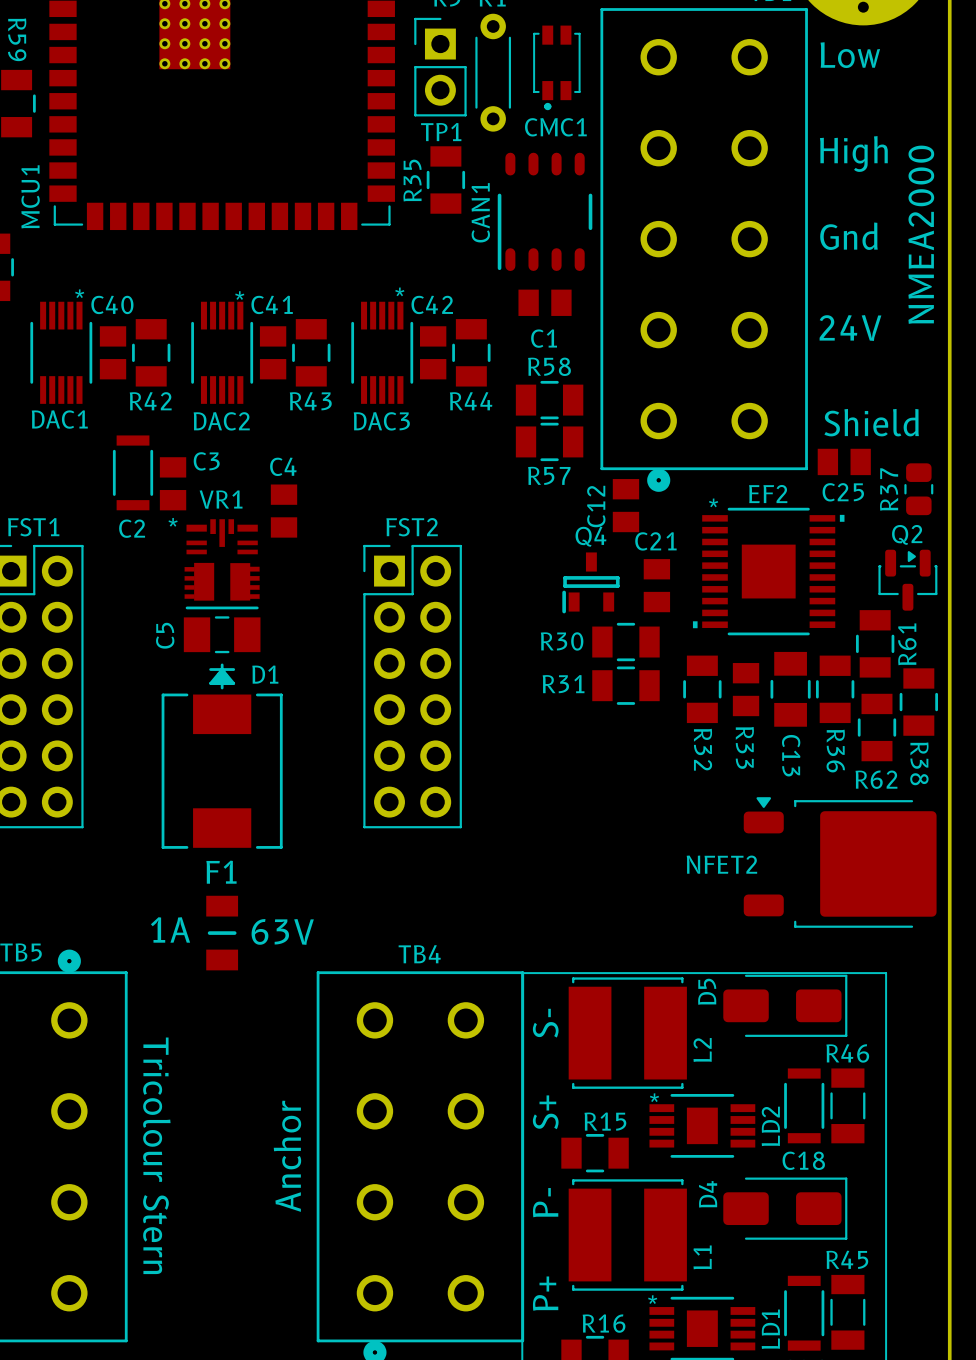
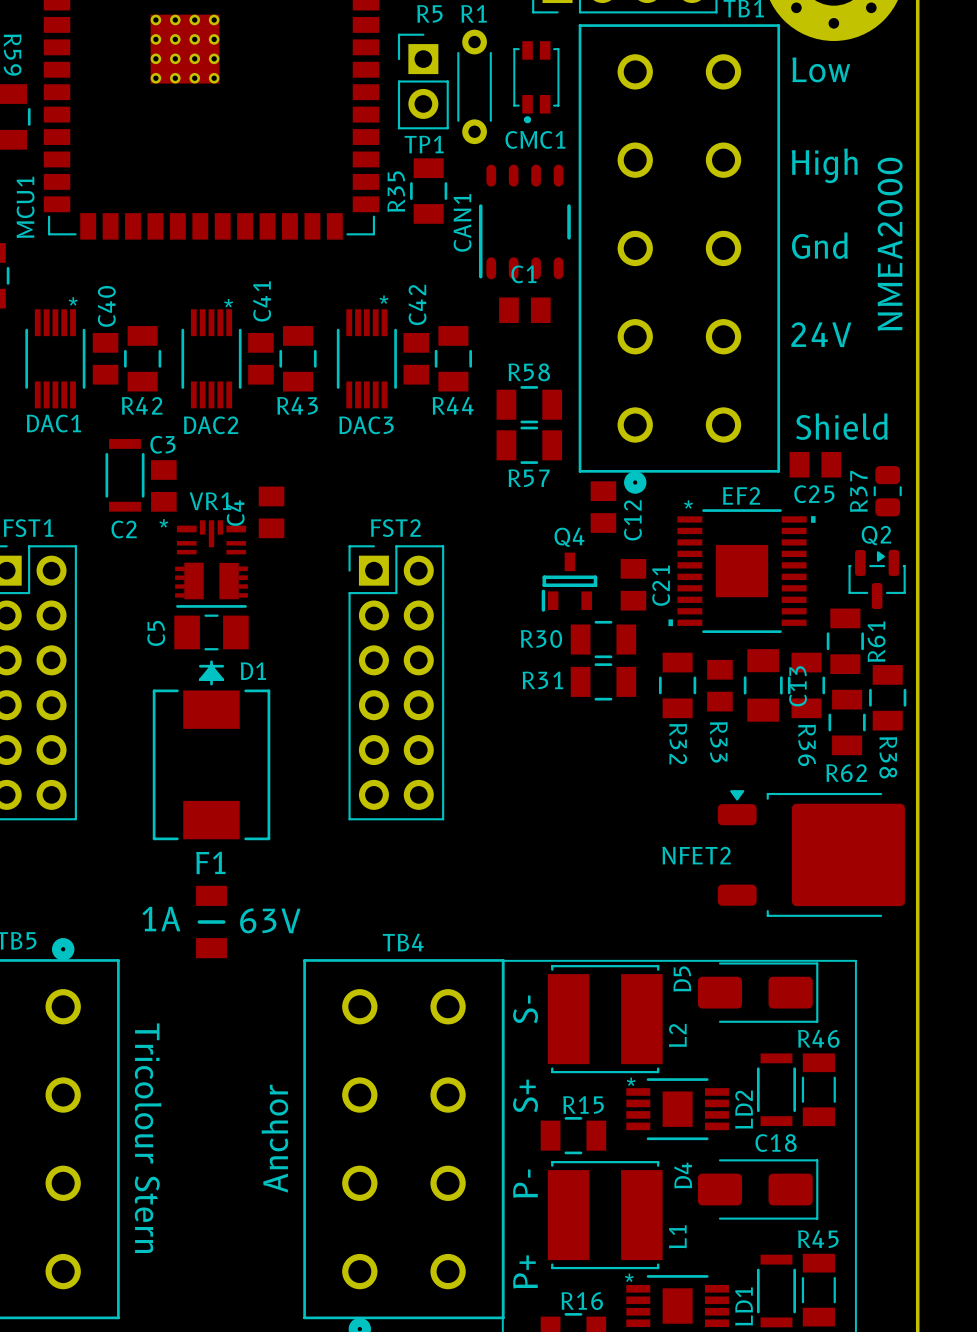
C40 name rotation: 0° (112, 304) -> 90° counterclockwise (106, 306)
C41 name rotation: 0° (272, 304) -> 90° counterclockwise (262, 301)
C42 name rotation: 0° (432, 304) -> 90° counterclockwise (417, 304)
C1 name position: C1 (544, 338) -> C1 (523, 274)
C3 name position: C3 (206, 461) -> C3 (162, 444)
C4 name rotation: 0° (283, 466) -> 90° counterclockwise (235, 513)
C4 name position: C4 (283, 466) -> C4 (235, 513)
C12 name position: C12 (596, 506) -> C12 (632, 520)
C21 name rotation: 0° (655, 541) -> 90° counterclockwise (661, 585)
C13 name rotation: 0° (791, 755) -> 180° (797, 686)
C13 name position: C13 (791, 755) -> C13 (797, 686)

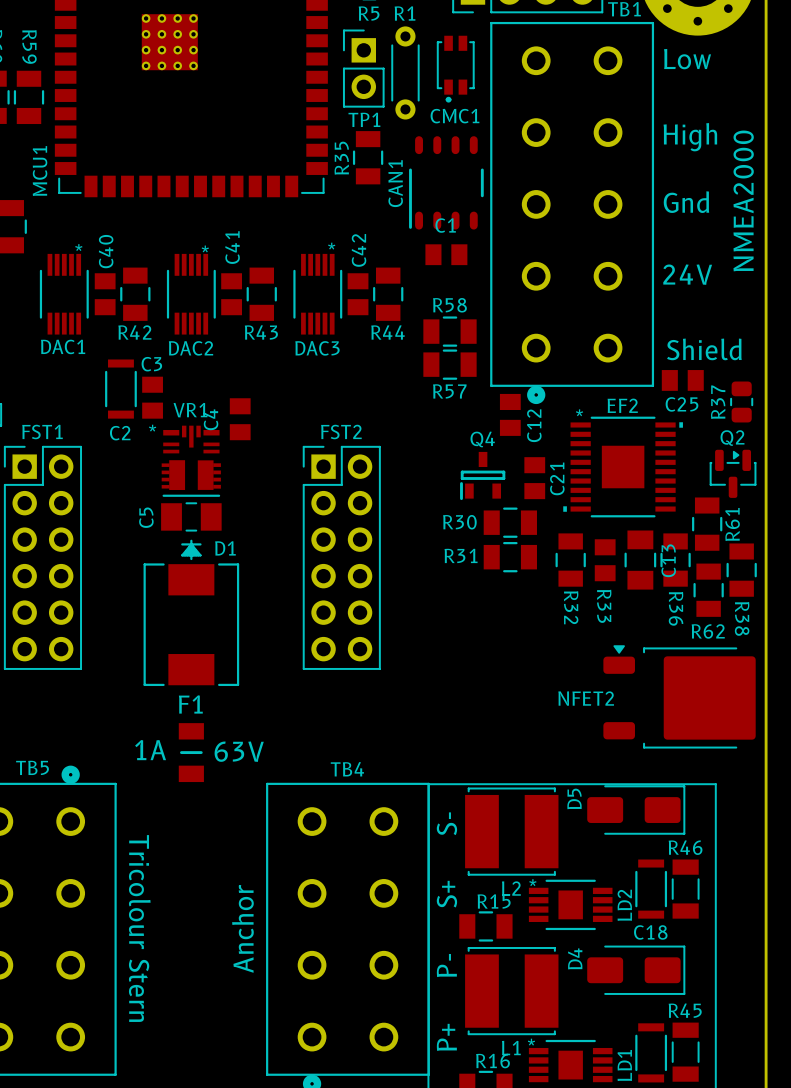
L2 name rotation: 0° (677, 1035) -> 90° clockwise (511, 888)
L2 name position: L2 (677, 1035) -> L2 (511, 888)
L1 name rotation: 0° (677, 1236) -> 90° clockwise (511, 1048)
L1 name position: L1 (677, 1236) -> L1 (511, 1048)

